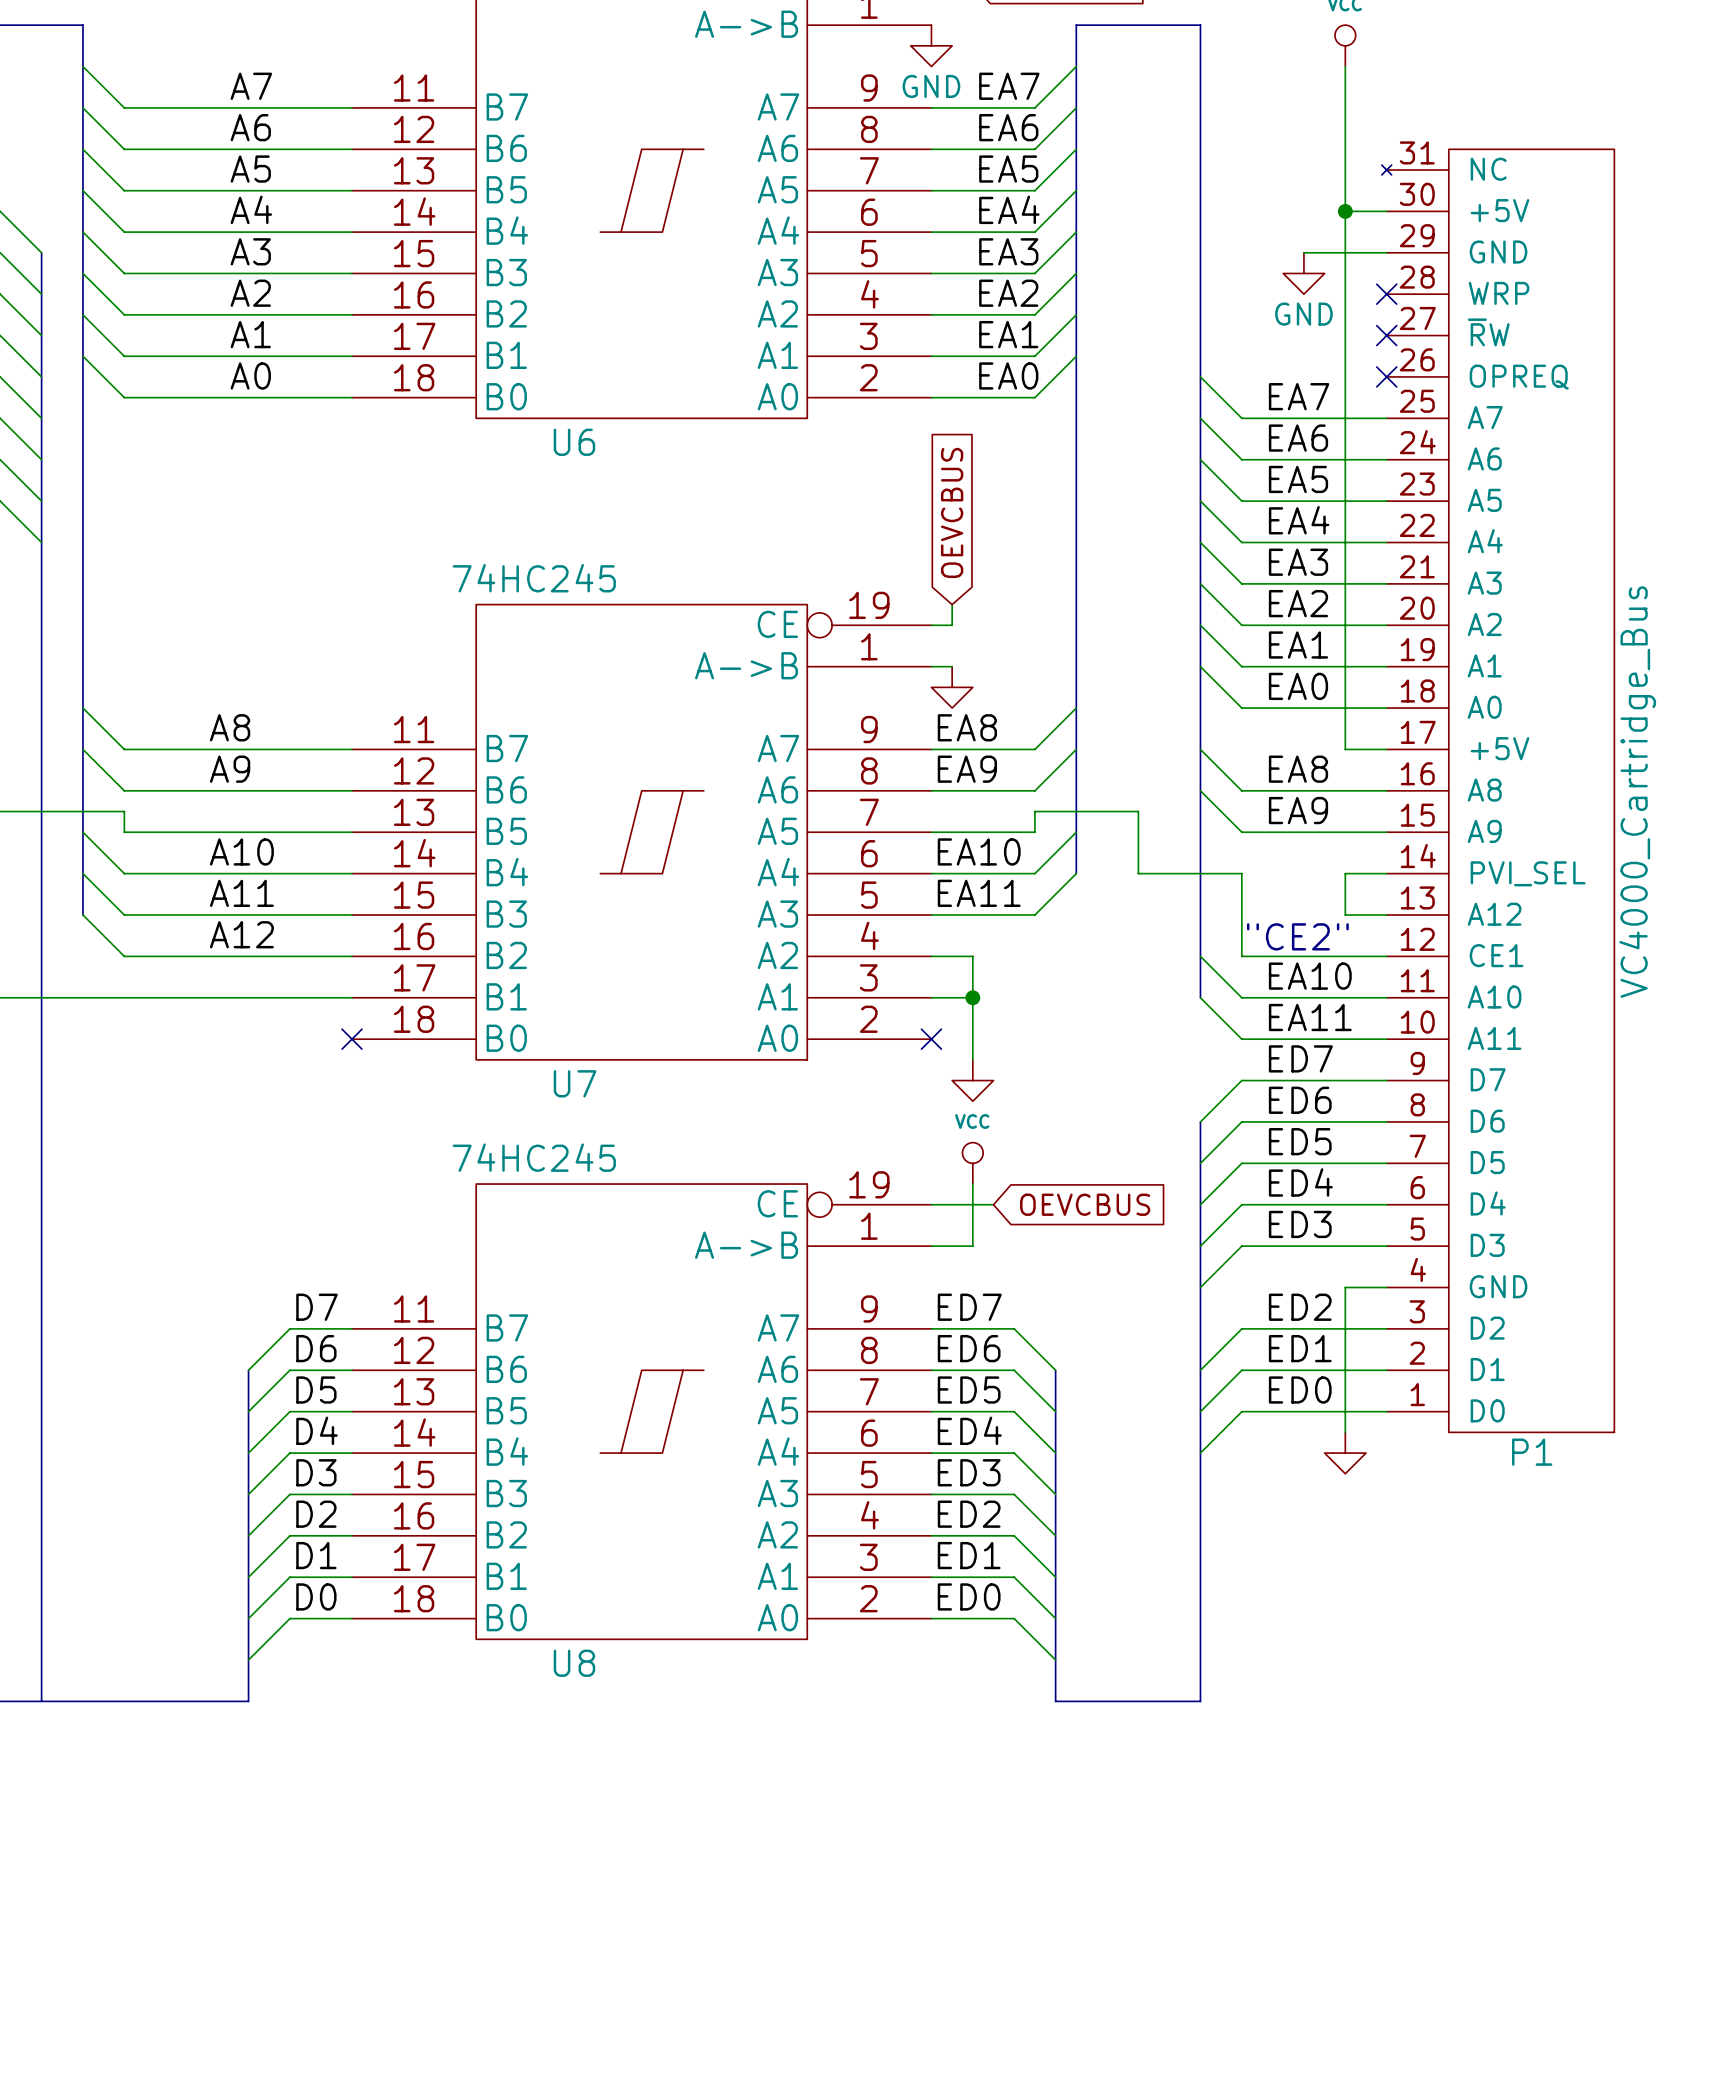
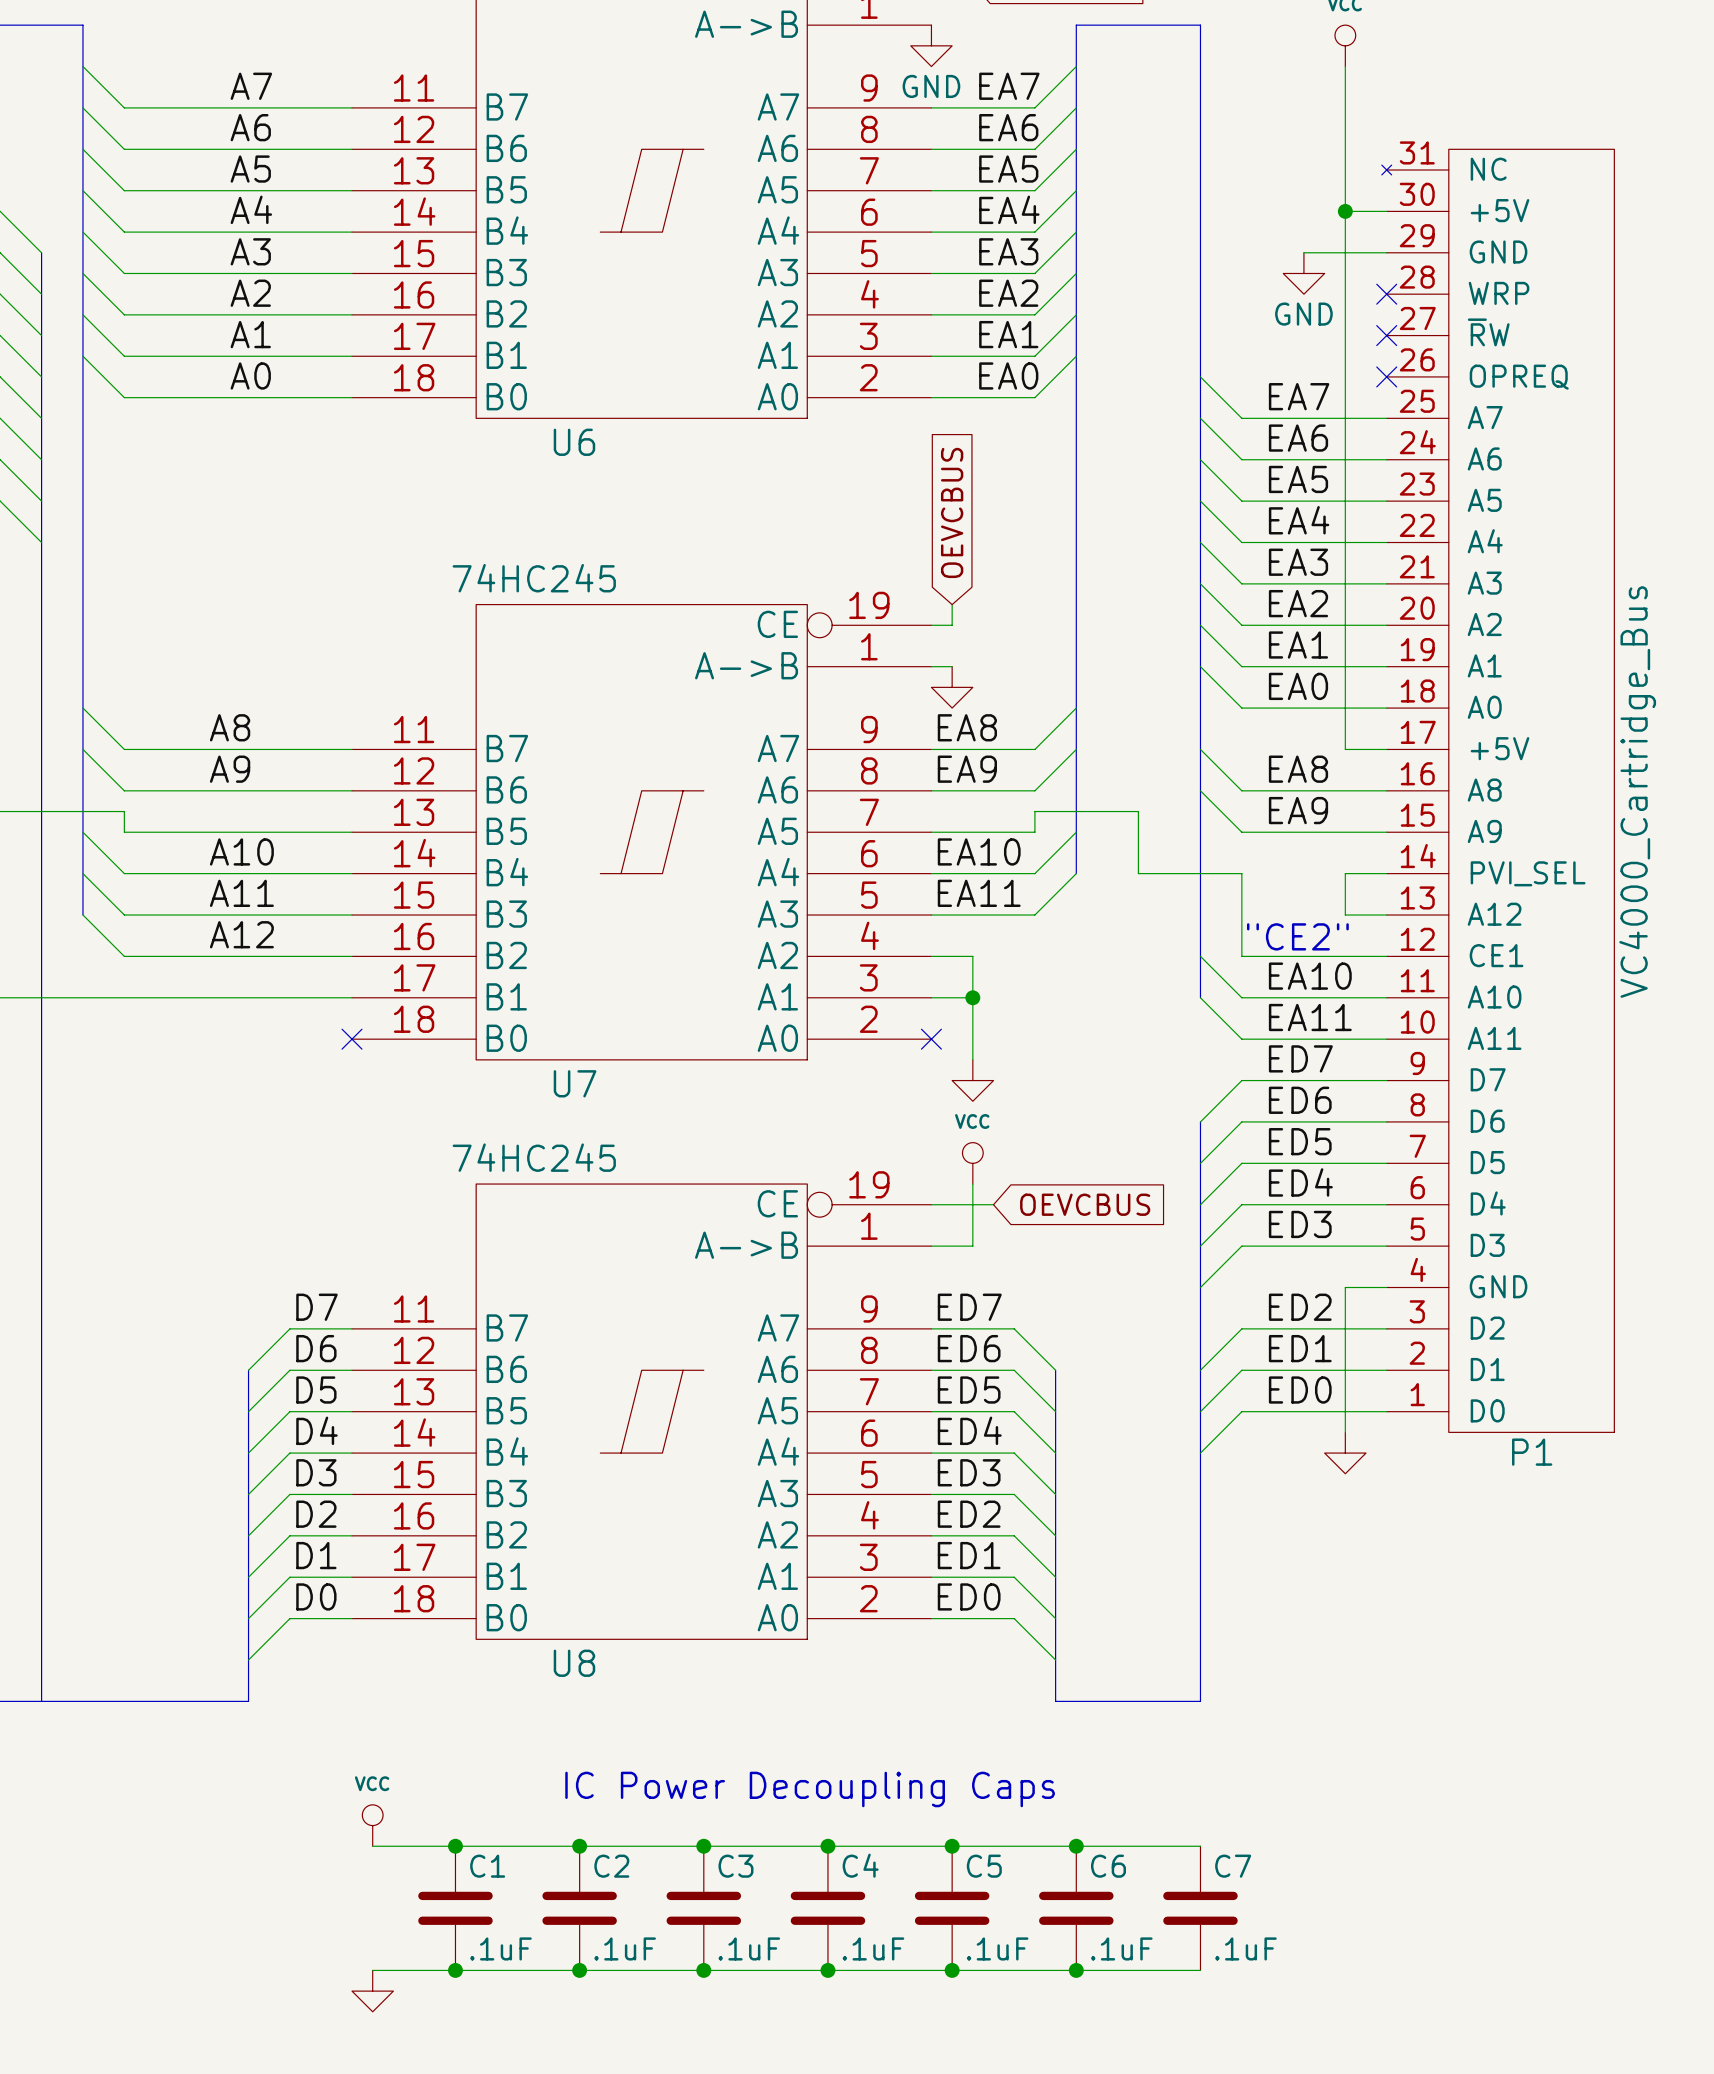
text: none -> IC Power Decoupling Caps (810, 1789)
power symbol: none -> VCC (372, 1825)
wire: none -> (372, 1846) (1200, 1846)
junction: none -> (455, 1846)
junction: none -> (579, 1846)
junction: none -> (703, 1846)
junction: none -> (827, 1846)
junction: none -> (952, 1846)
junction: none -> (1076, 1846)
C1: none -> .1uF (455, 1908)
C2: none -> .1uF (579, 1908)
C3: none -> .1uF (703, 1908)
C4: none -> .1uF (827, 1908)
C5: none -> .1uF (952, 1908)
C6: none -> .1uF (1076, 1908)
C7: none -> .1uF (1200, 1908)
wire: none -> (372, 1970) (1200, 1970)
junction: none -> (455, 1970)
junction: none -> (579, 1970)
junction: none -> (703, 1970)
junction: none -> (827, 1970)
junction: none -> (952, 1970)
junction: none -> (1076, 1970)
power symbol: none -> (372, 1991)

